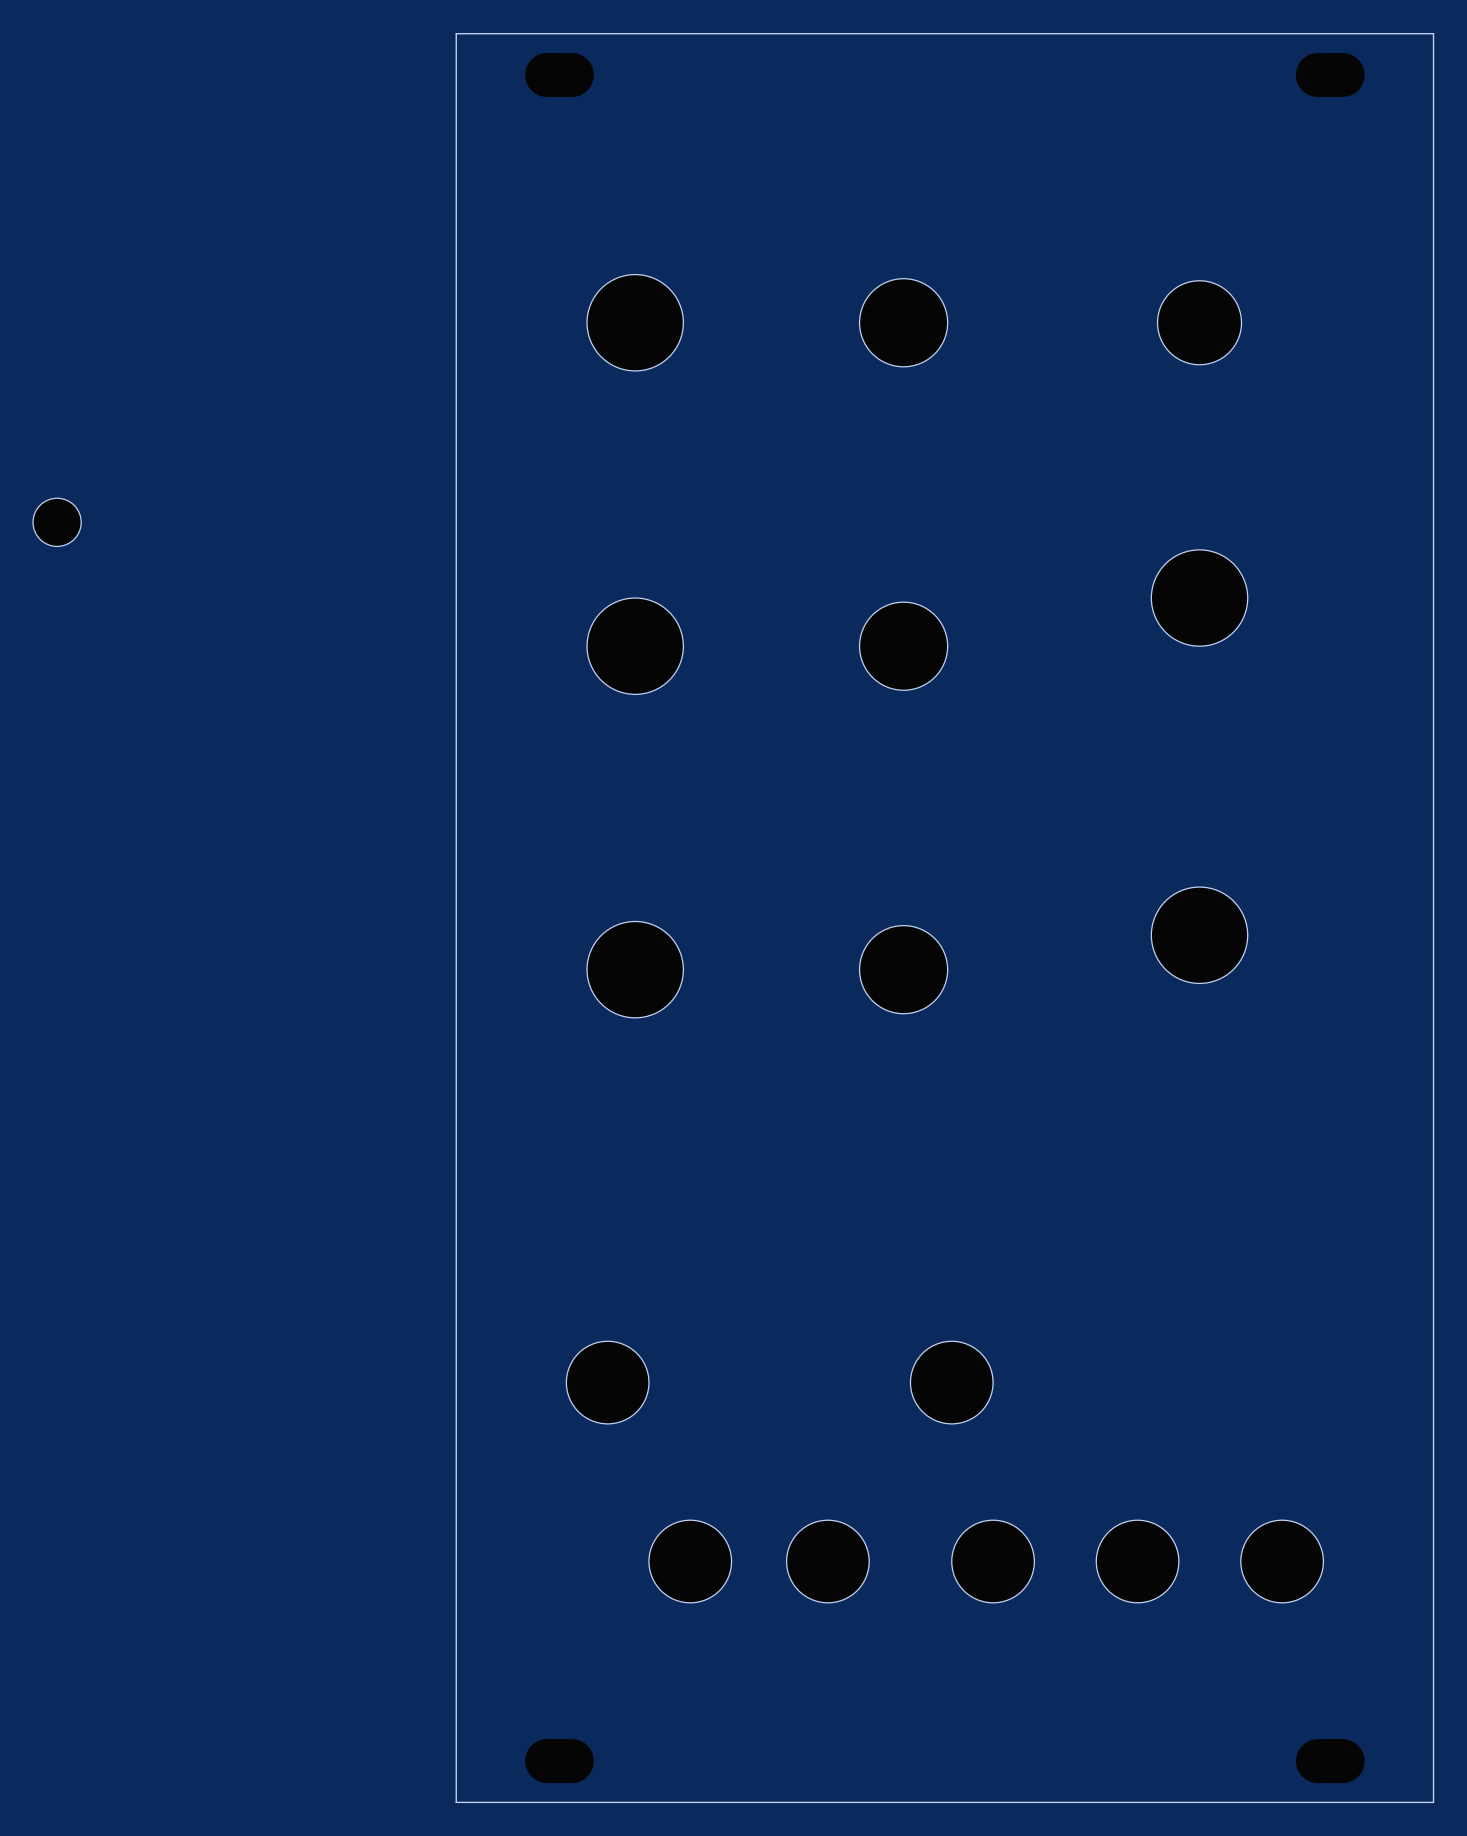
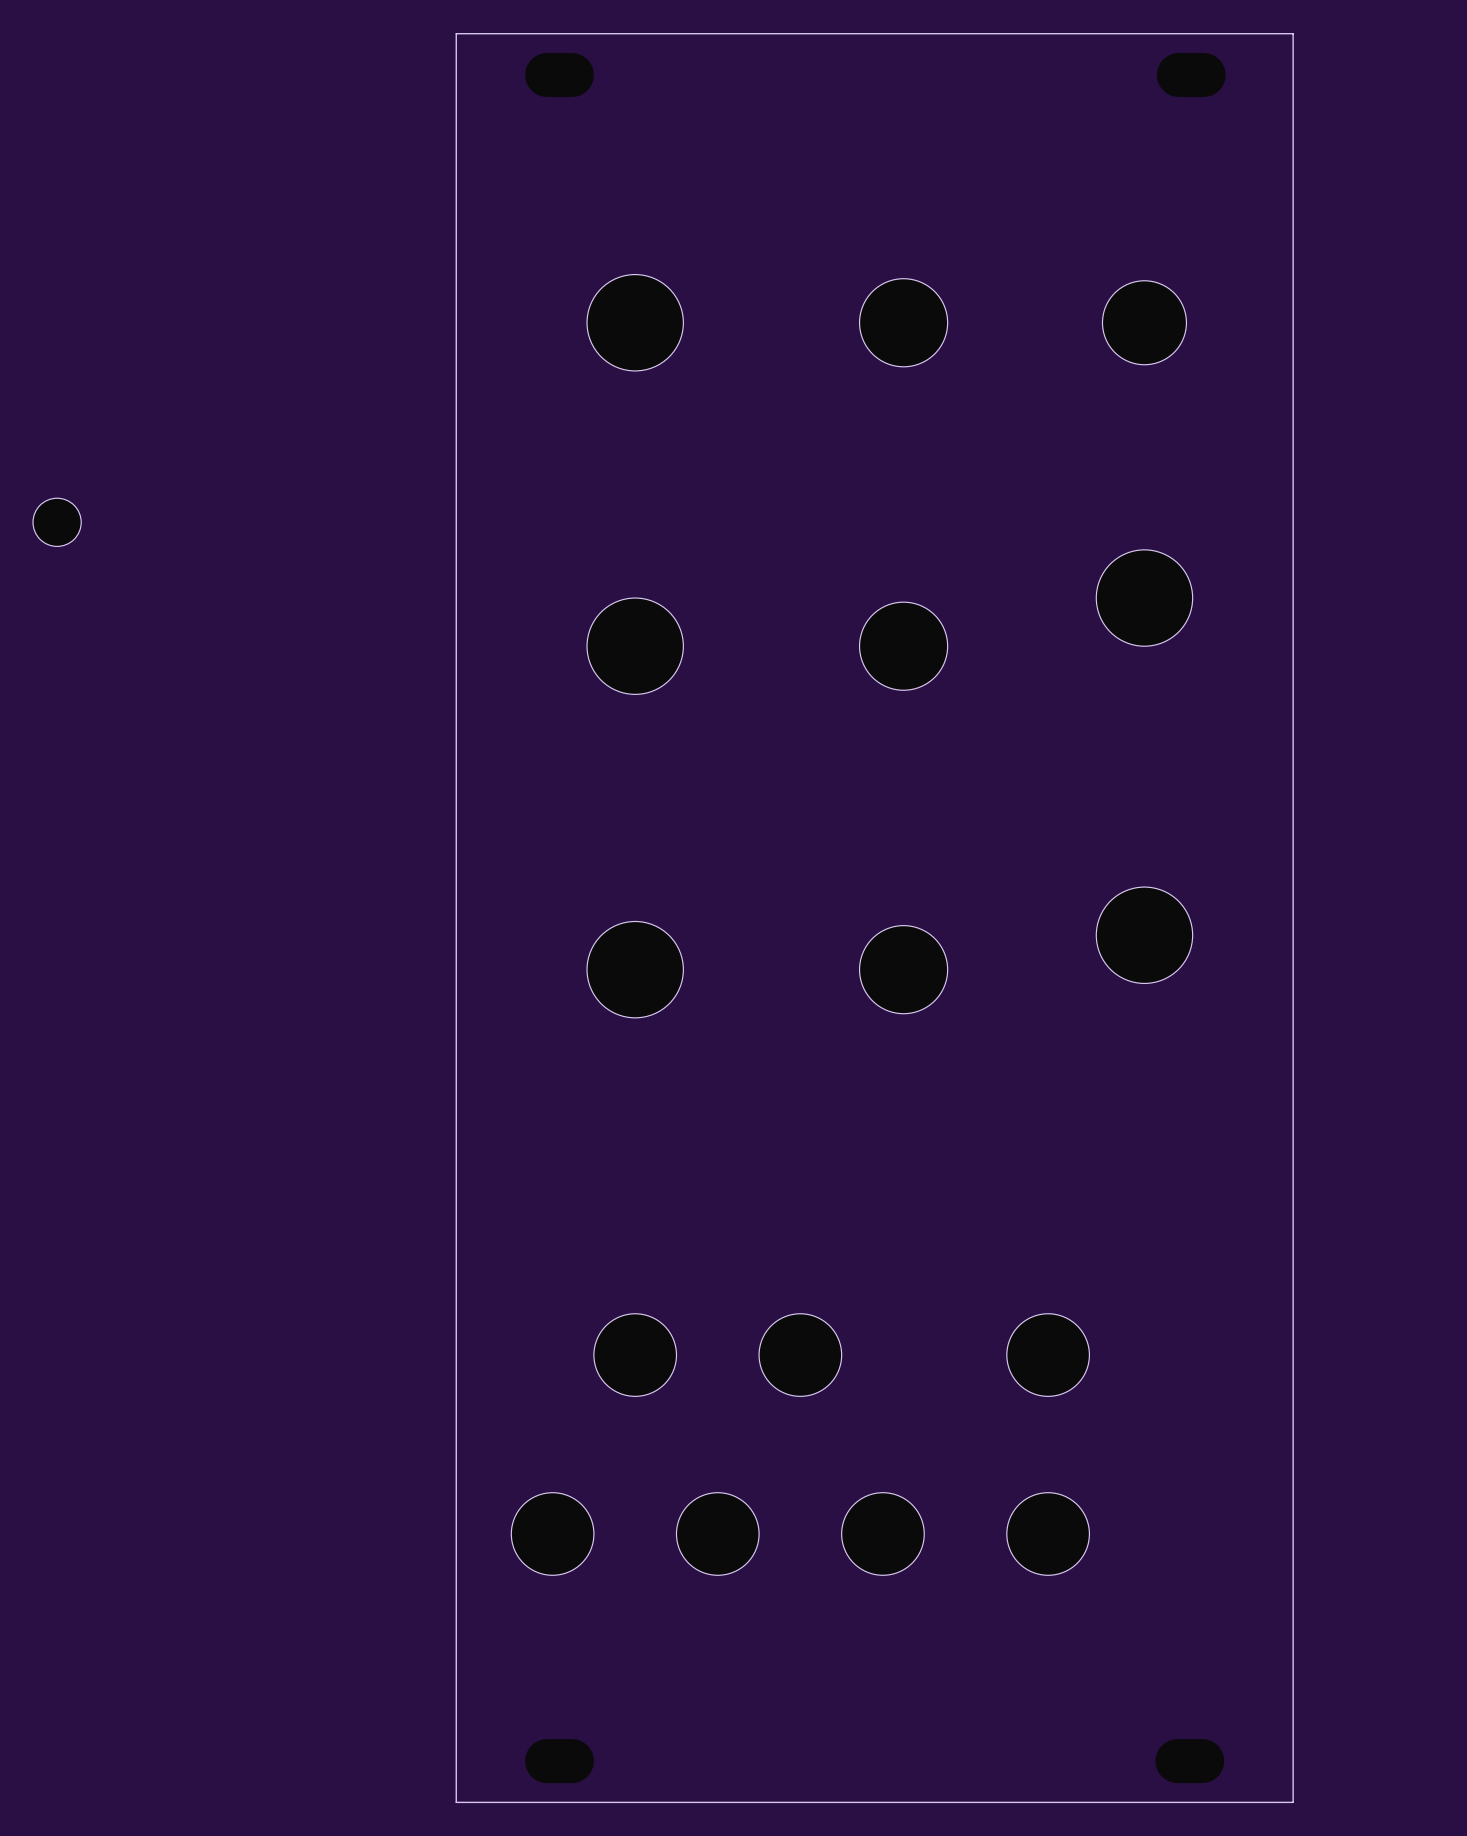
board edge: (1293, 33) (1433, 33) (1433, 1802) (1293, 1802) -> (1293, 33) (1293, 1802)
part position: (1330, 75) -> (1191, 75)
part position: (1199, 322) -> (1144, 322)
part position: (1199, 598) -> (1144, 598)
part position: (1199, 935) -> (1144, 935)
part: none -> (800, 1355)
part: none -> (1048, 1355)
part position: (607, 1382) -> (635, 1355)
part: (951, 1382) -> none
part: none -> (552, 1533)
part: none -> (882, 1533)
part: none -> (1048, 1533)
part position: (690, 1561) -> (717, 1533)
part: (827, 1561) -> none
part: (993, 1561) -> none
part: (1137, 1561) -> none
part: (1282, 1561) -> none
part position: (1330, 1761) -> (1189, 1761)

